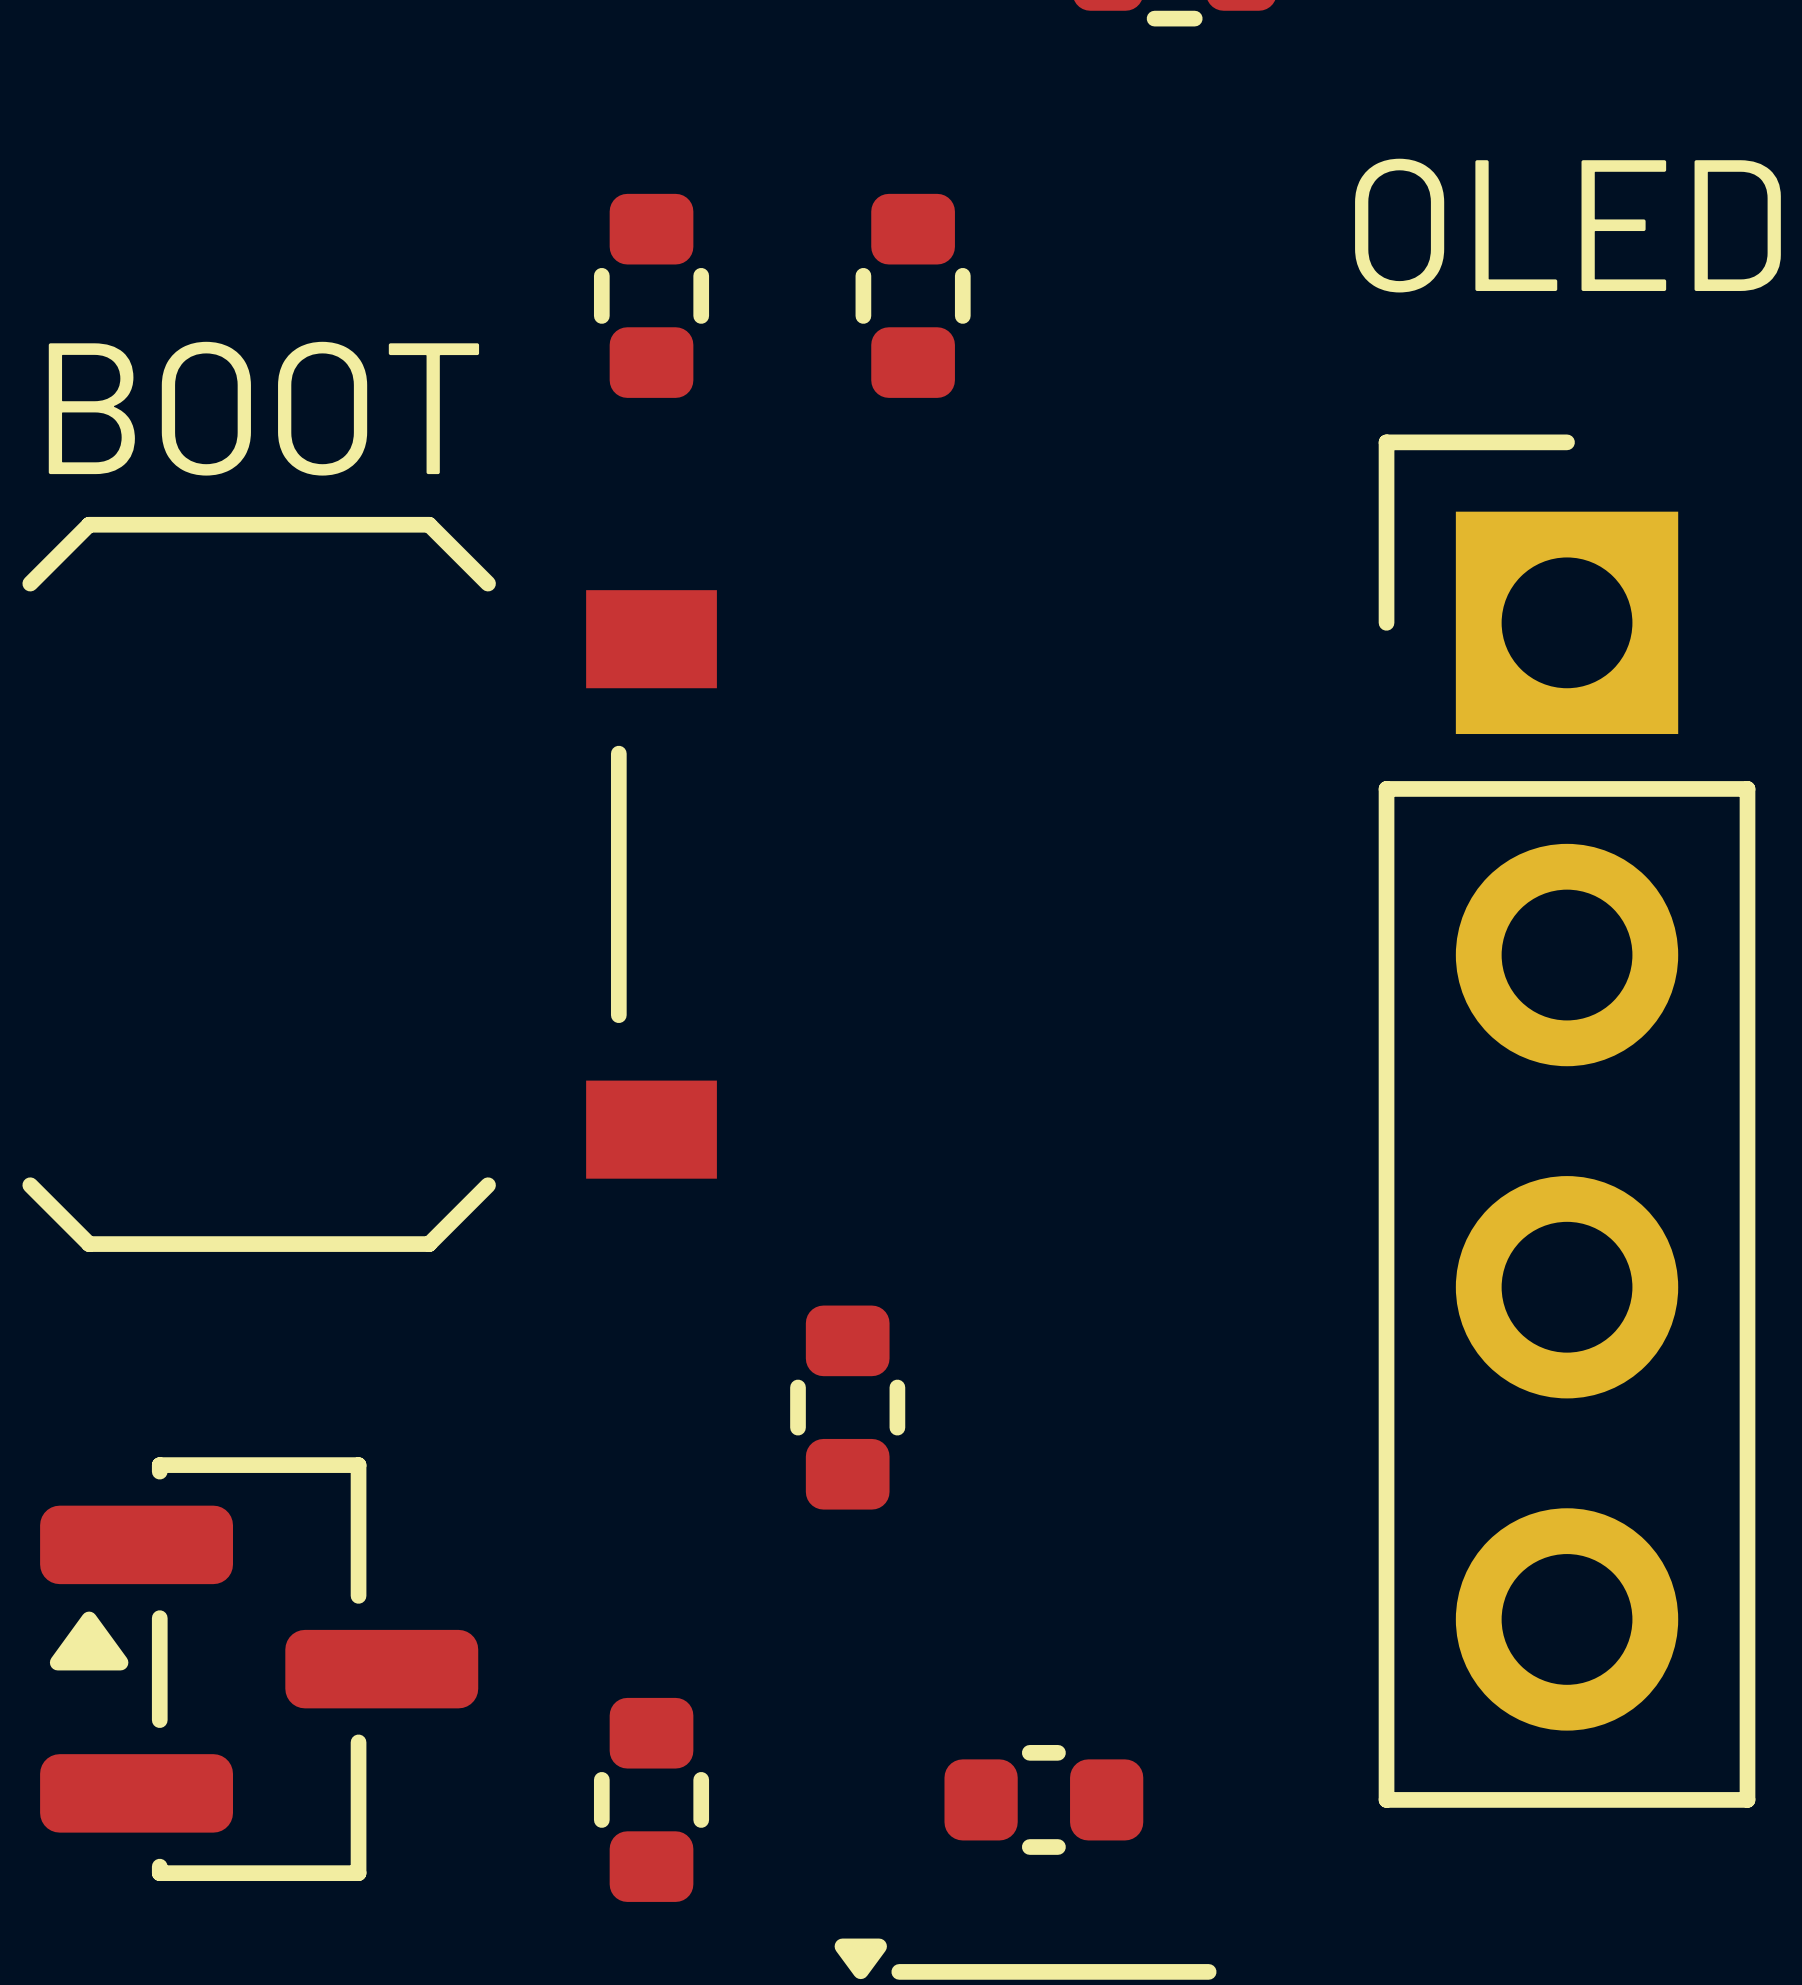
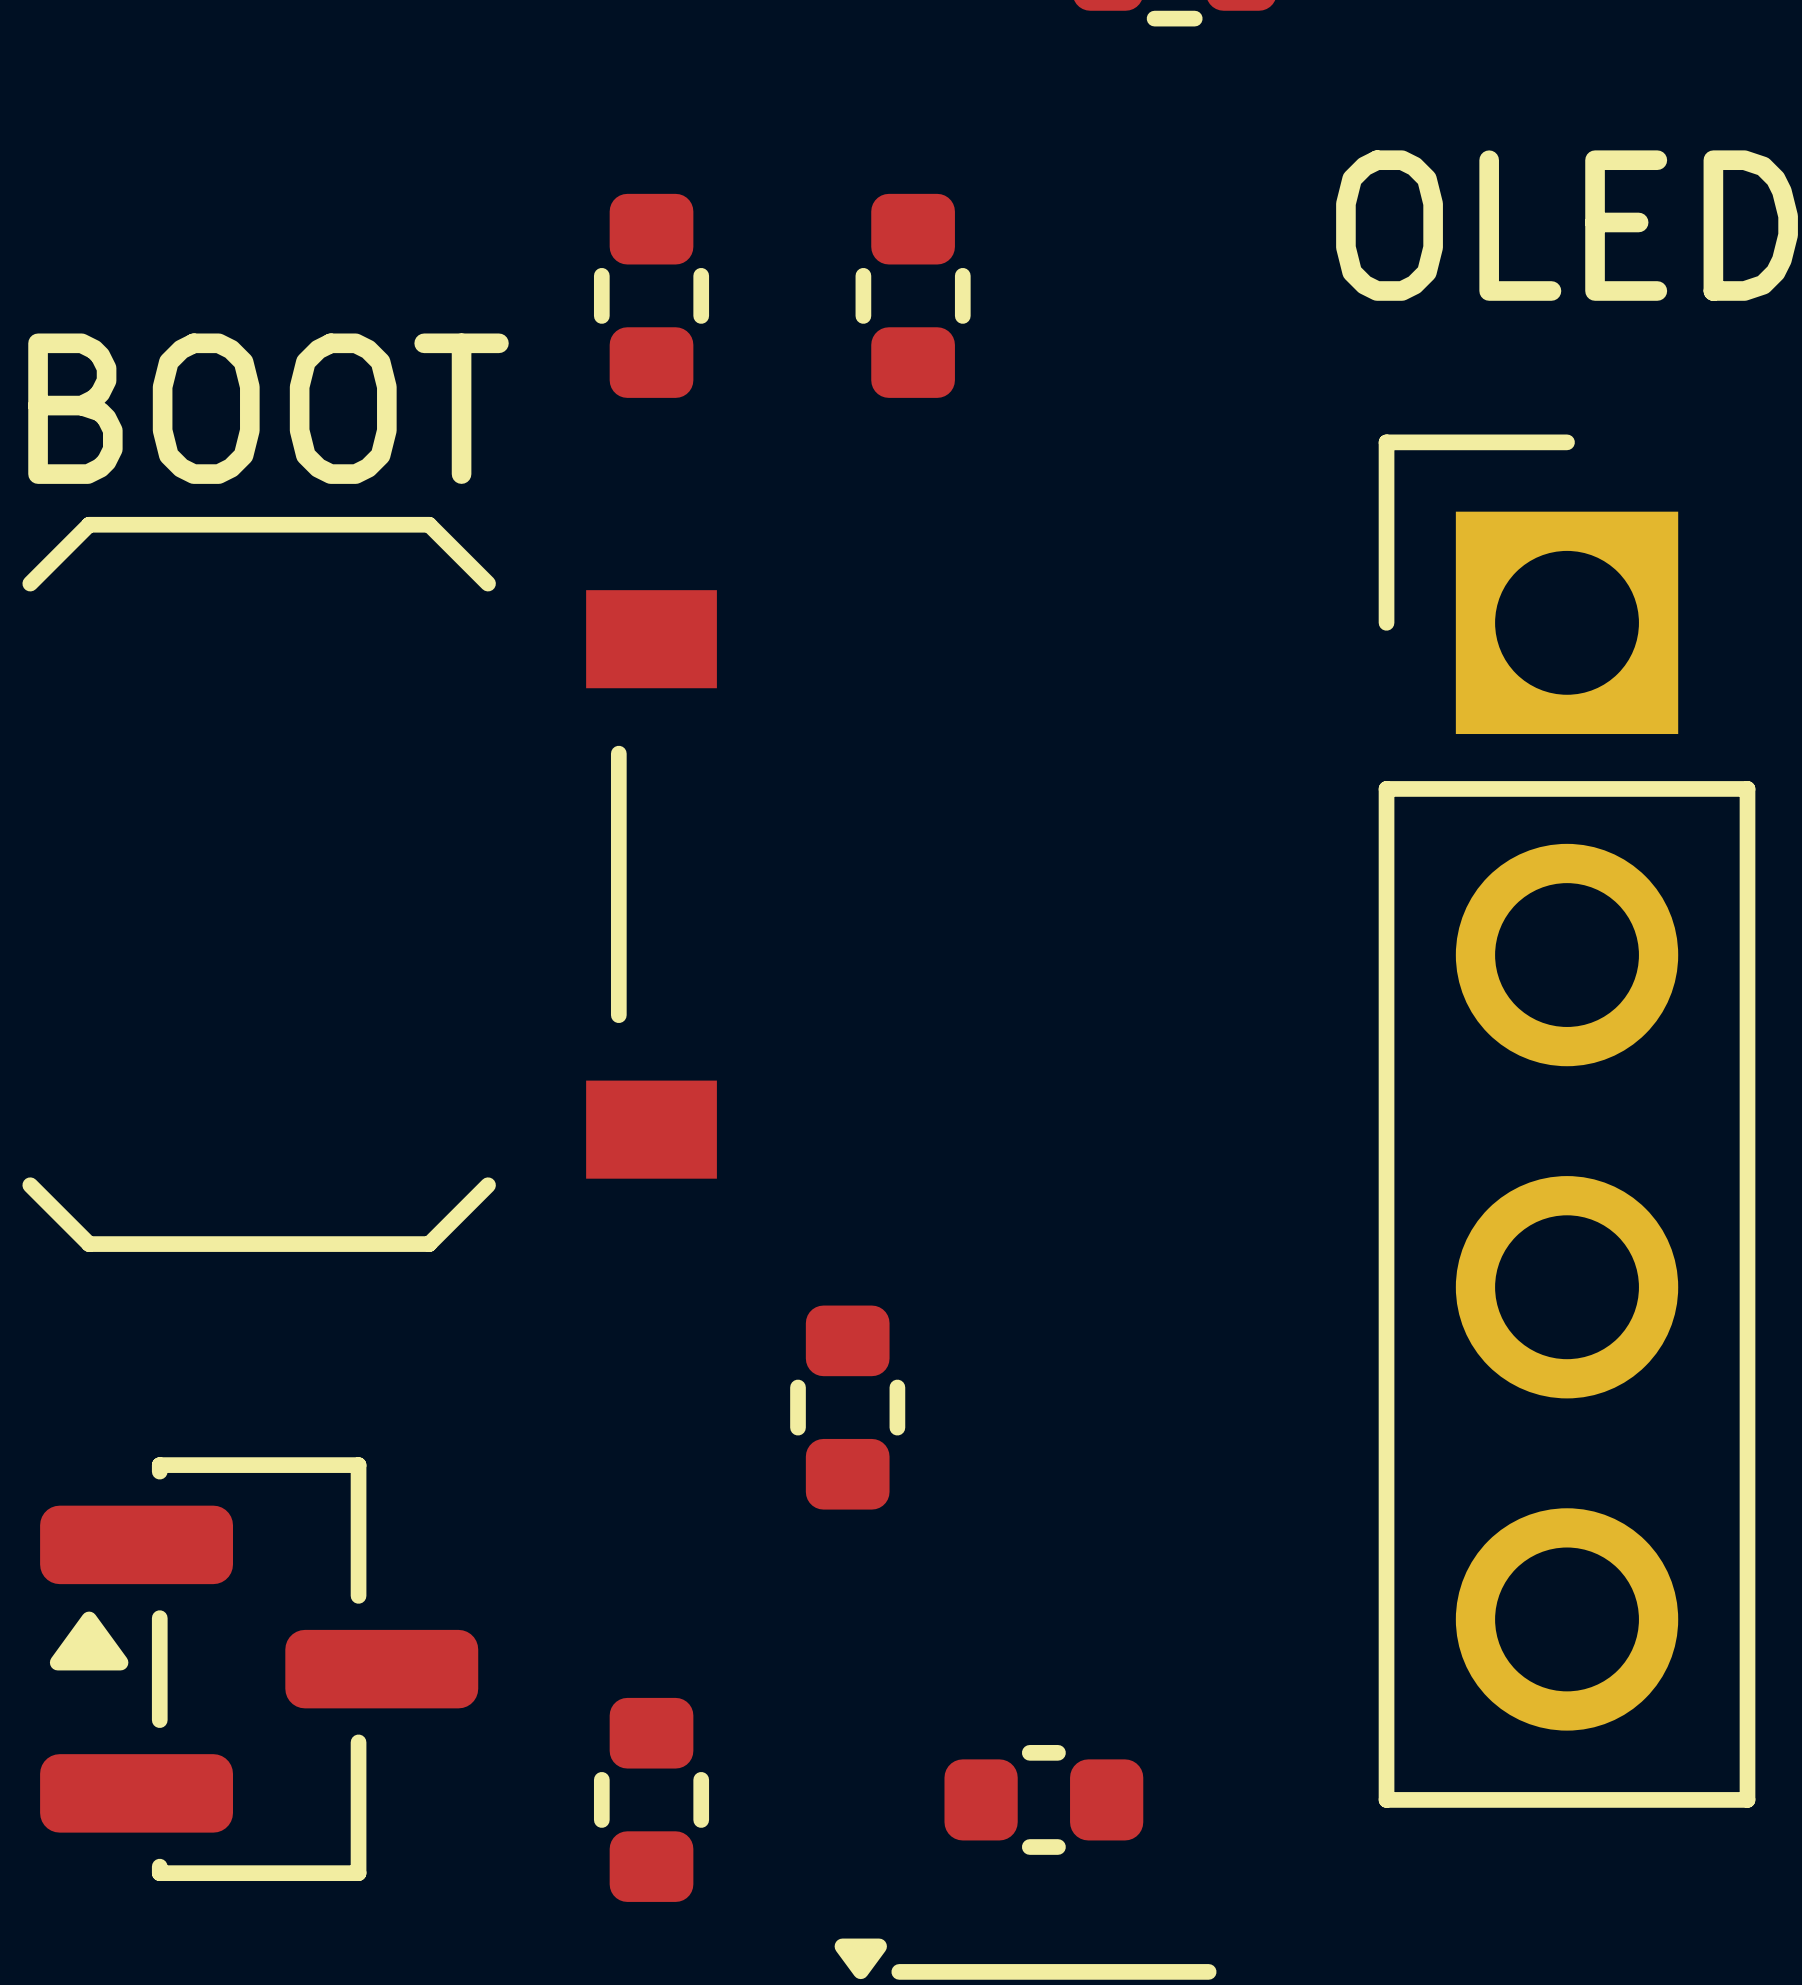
part footprint: [1378, 434, 1756, 1808] -> [1378, 434, 1756, 1808]

